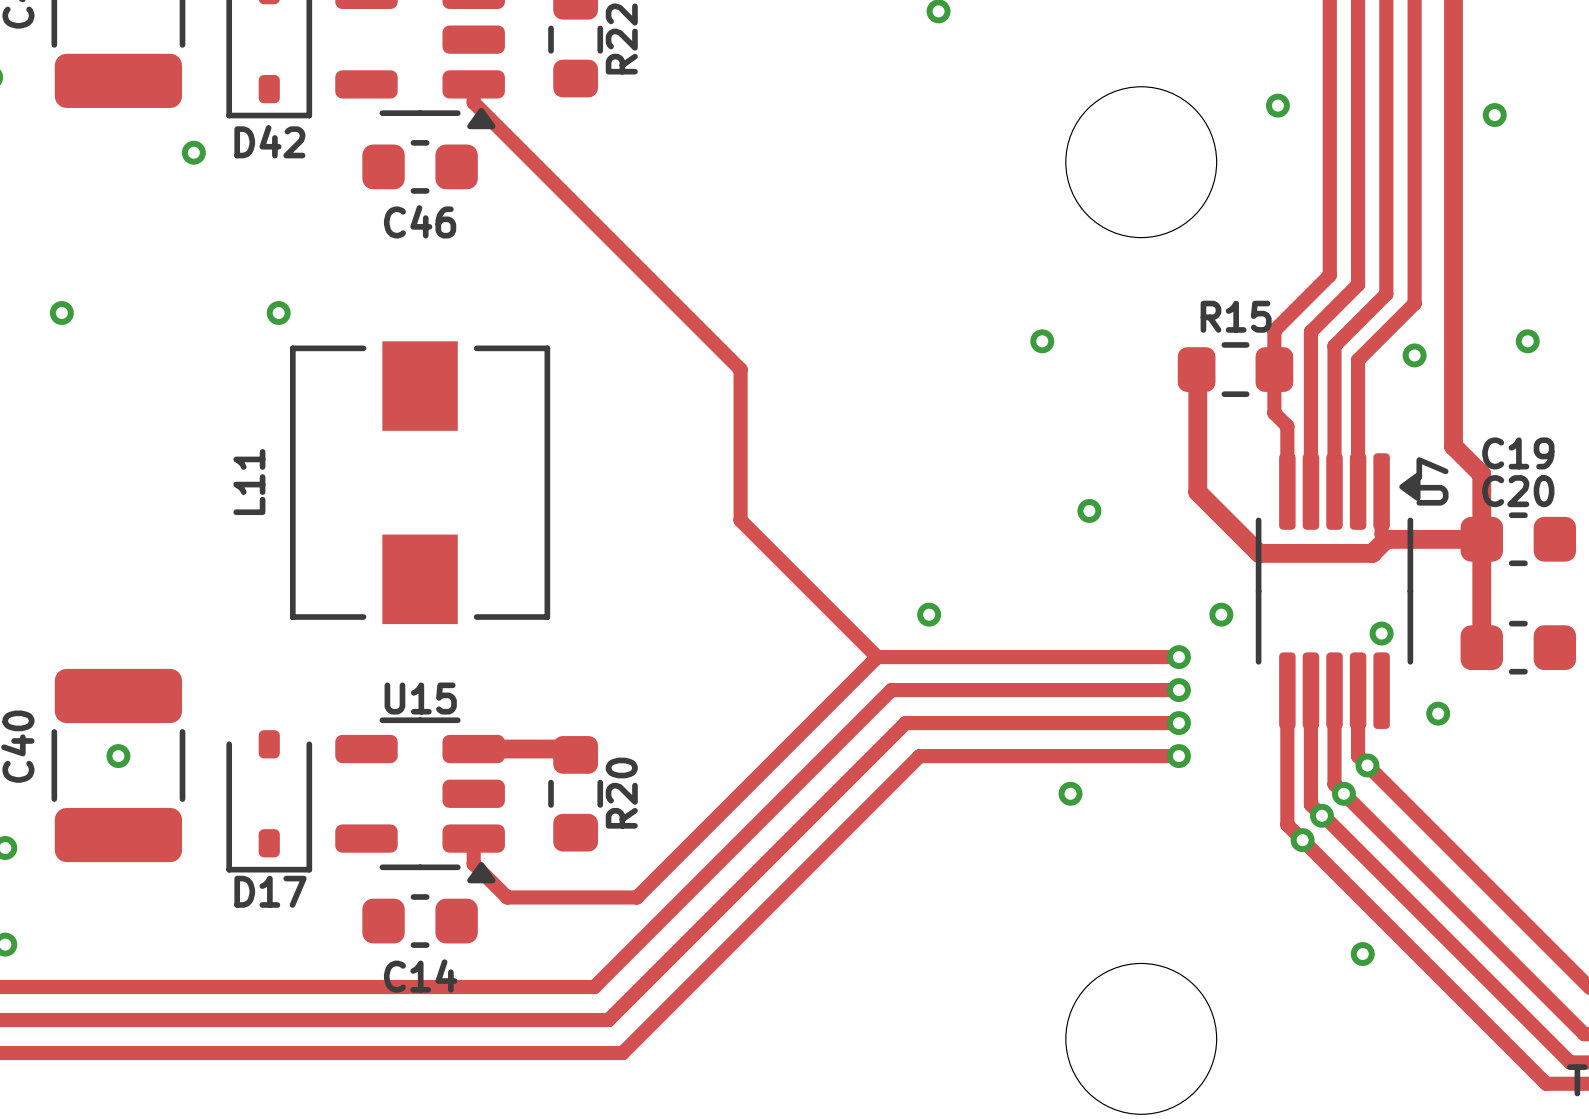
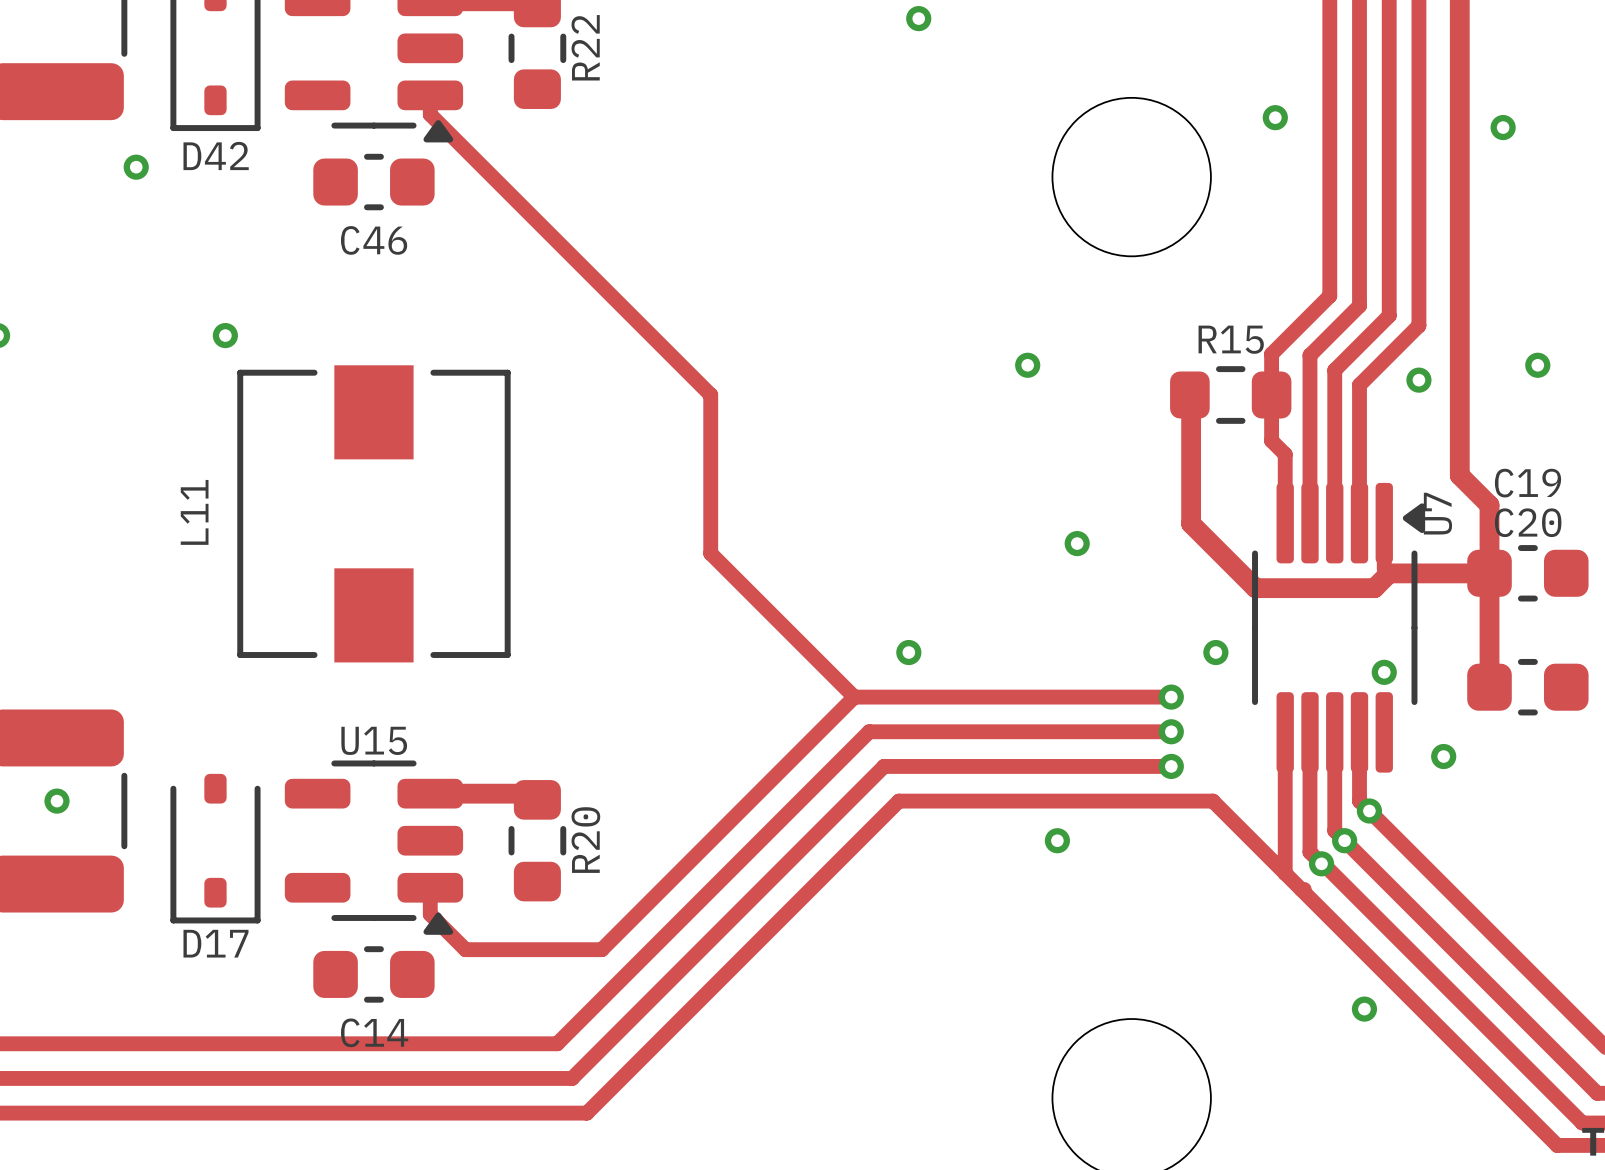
track: none -> (1171, 801) (1212, 801) (1285, 873)
via: (1178, 756) -> none
via: (1302, 840) -> none

